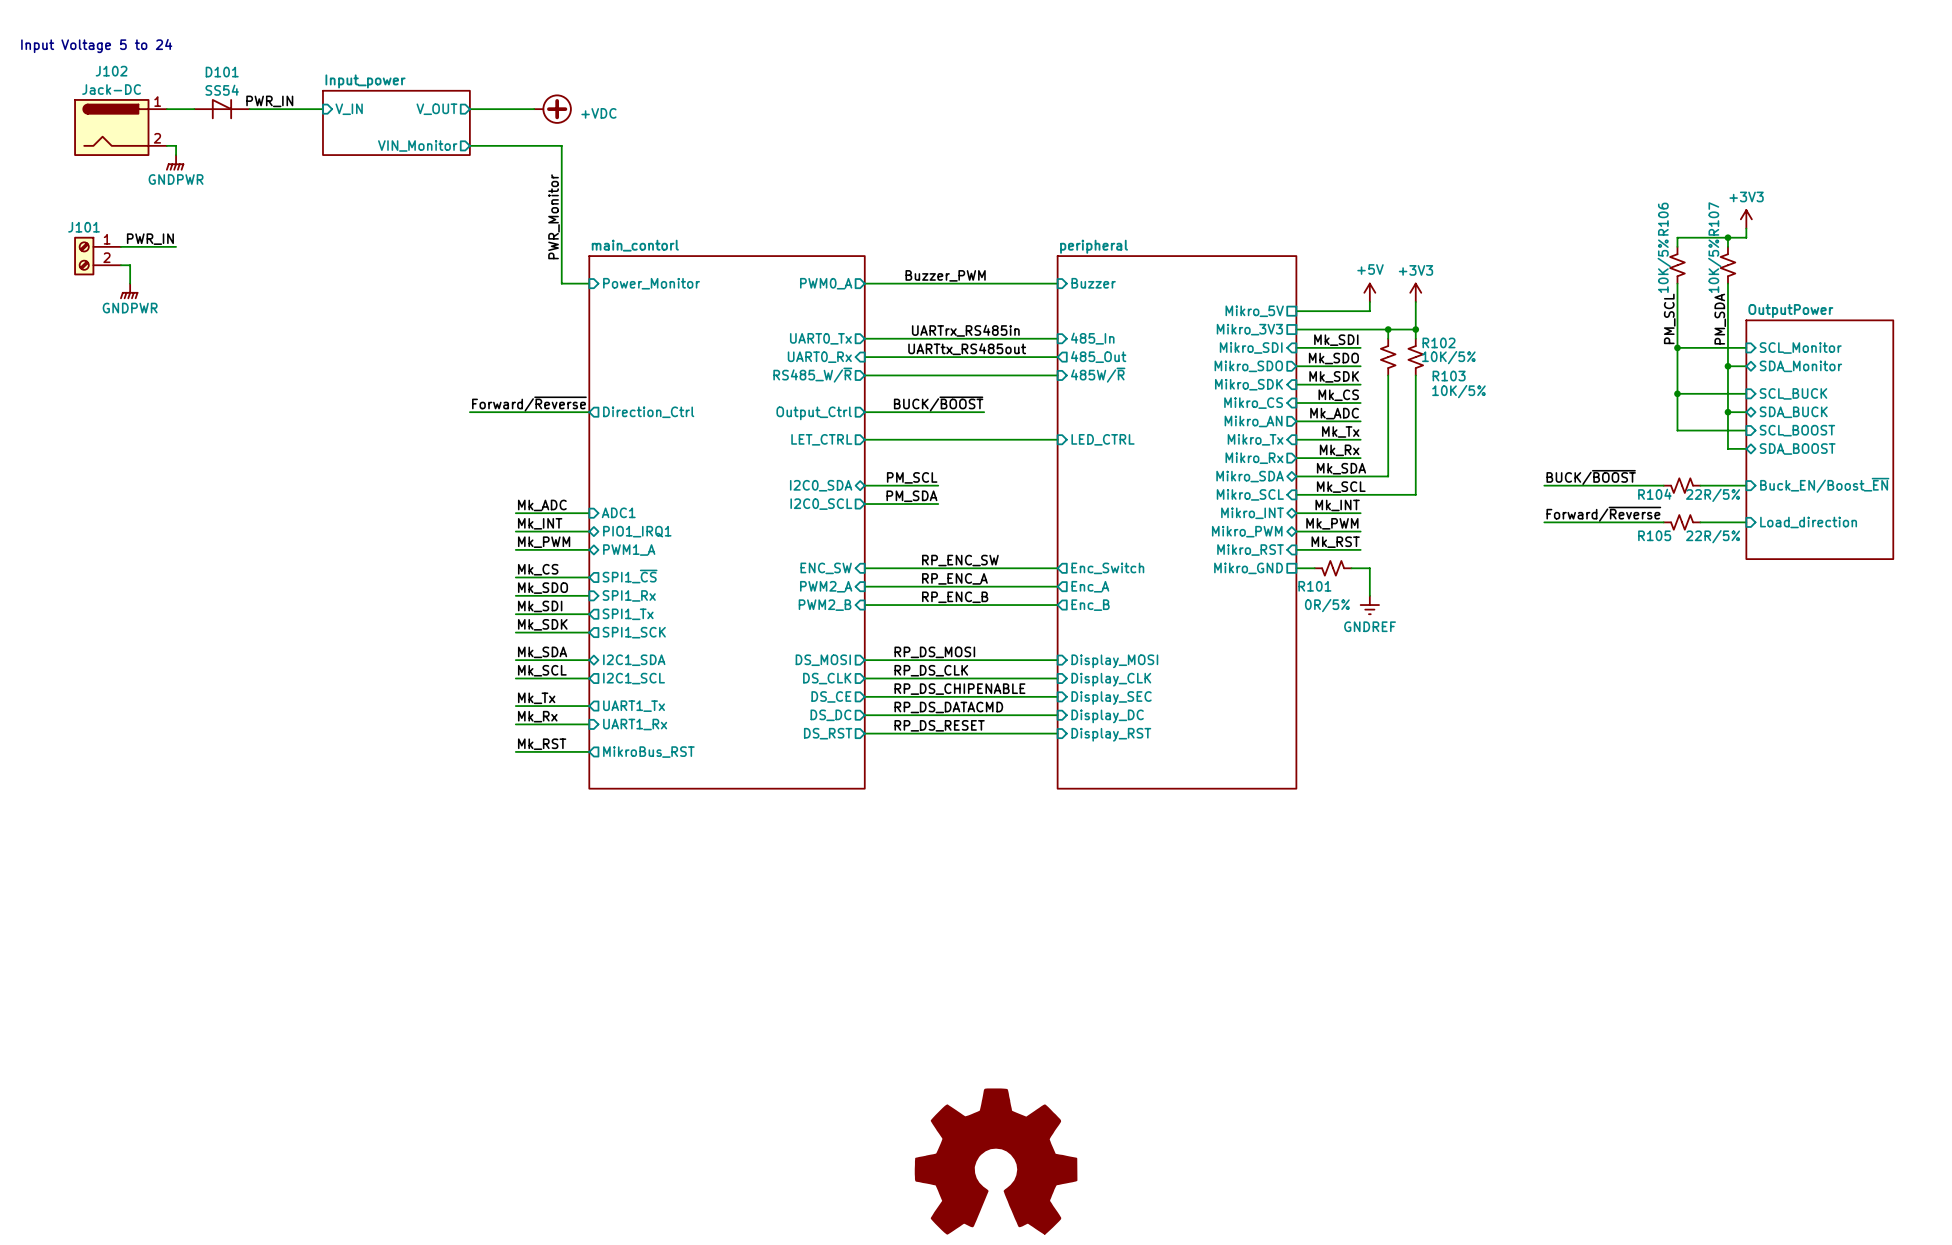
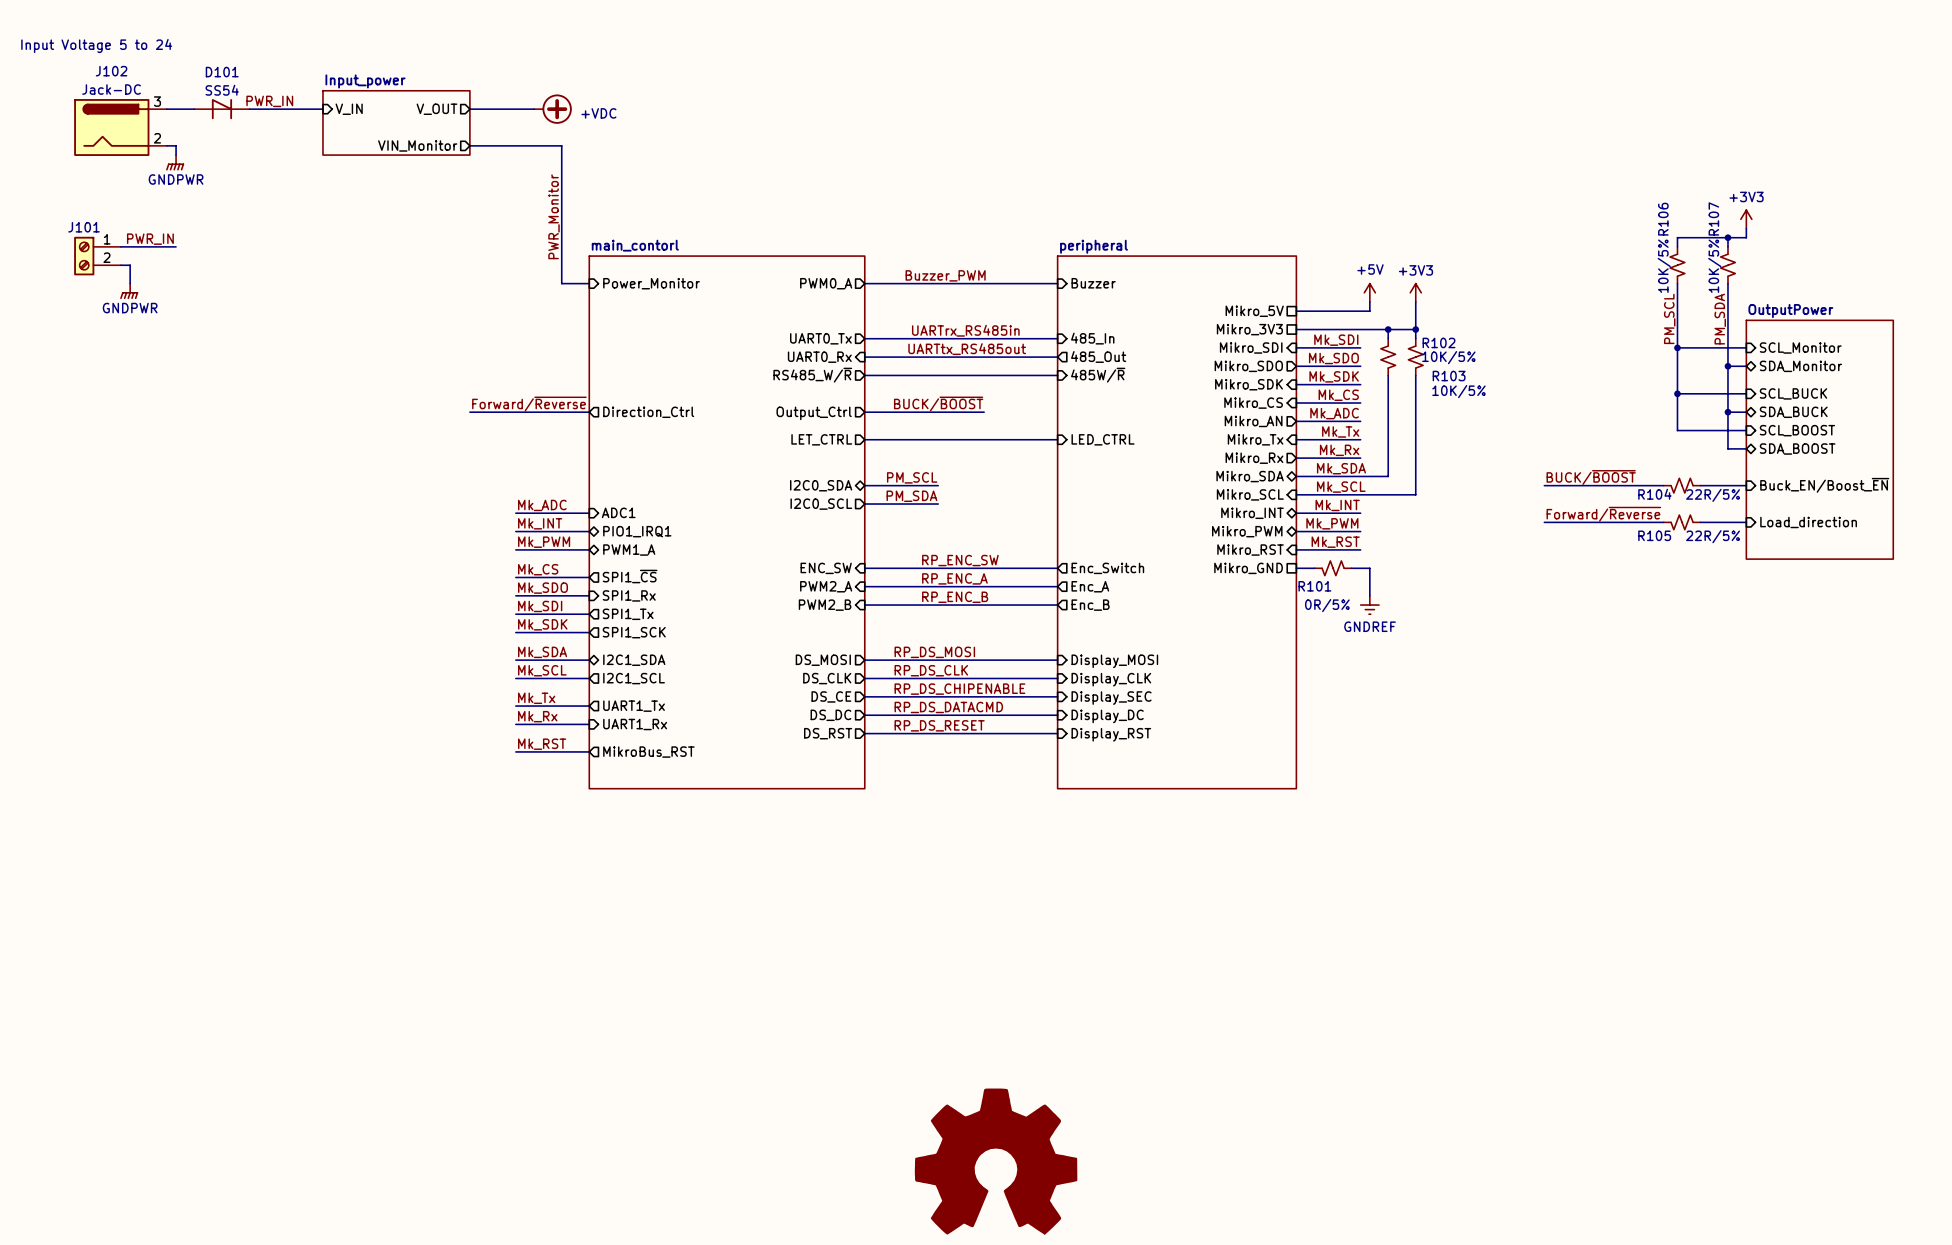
J102 pin number: 1 (157, 101) -> 3 (157, 101)

